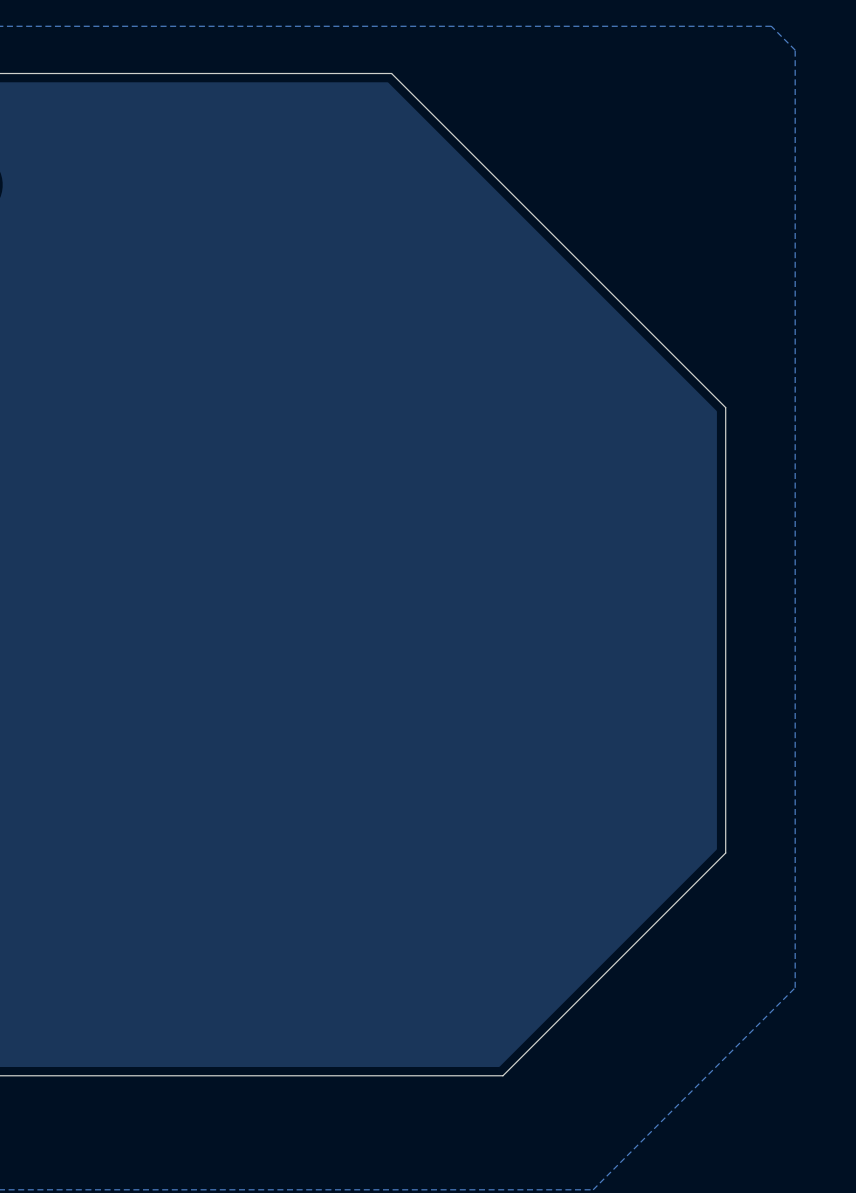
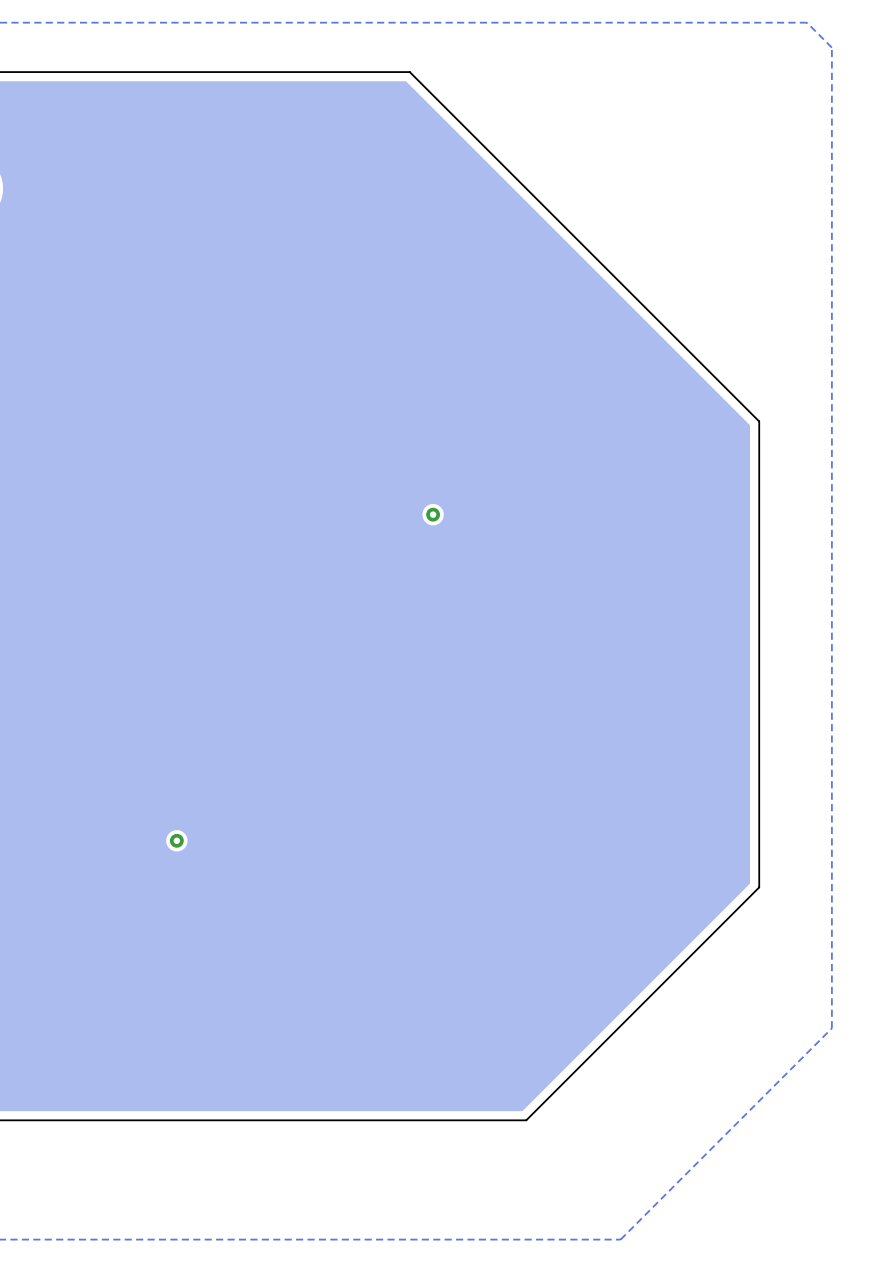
via: none -> (433, 514)
via: none -> (176, 840)

